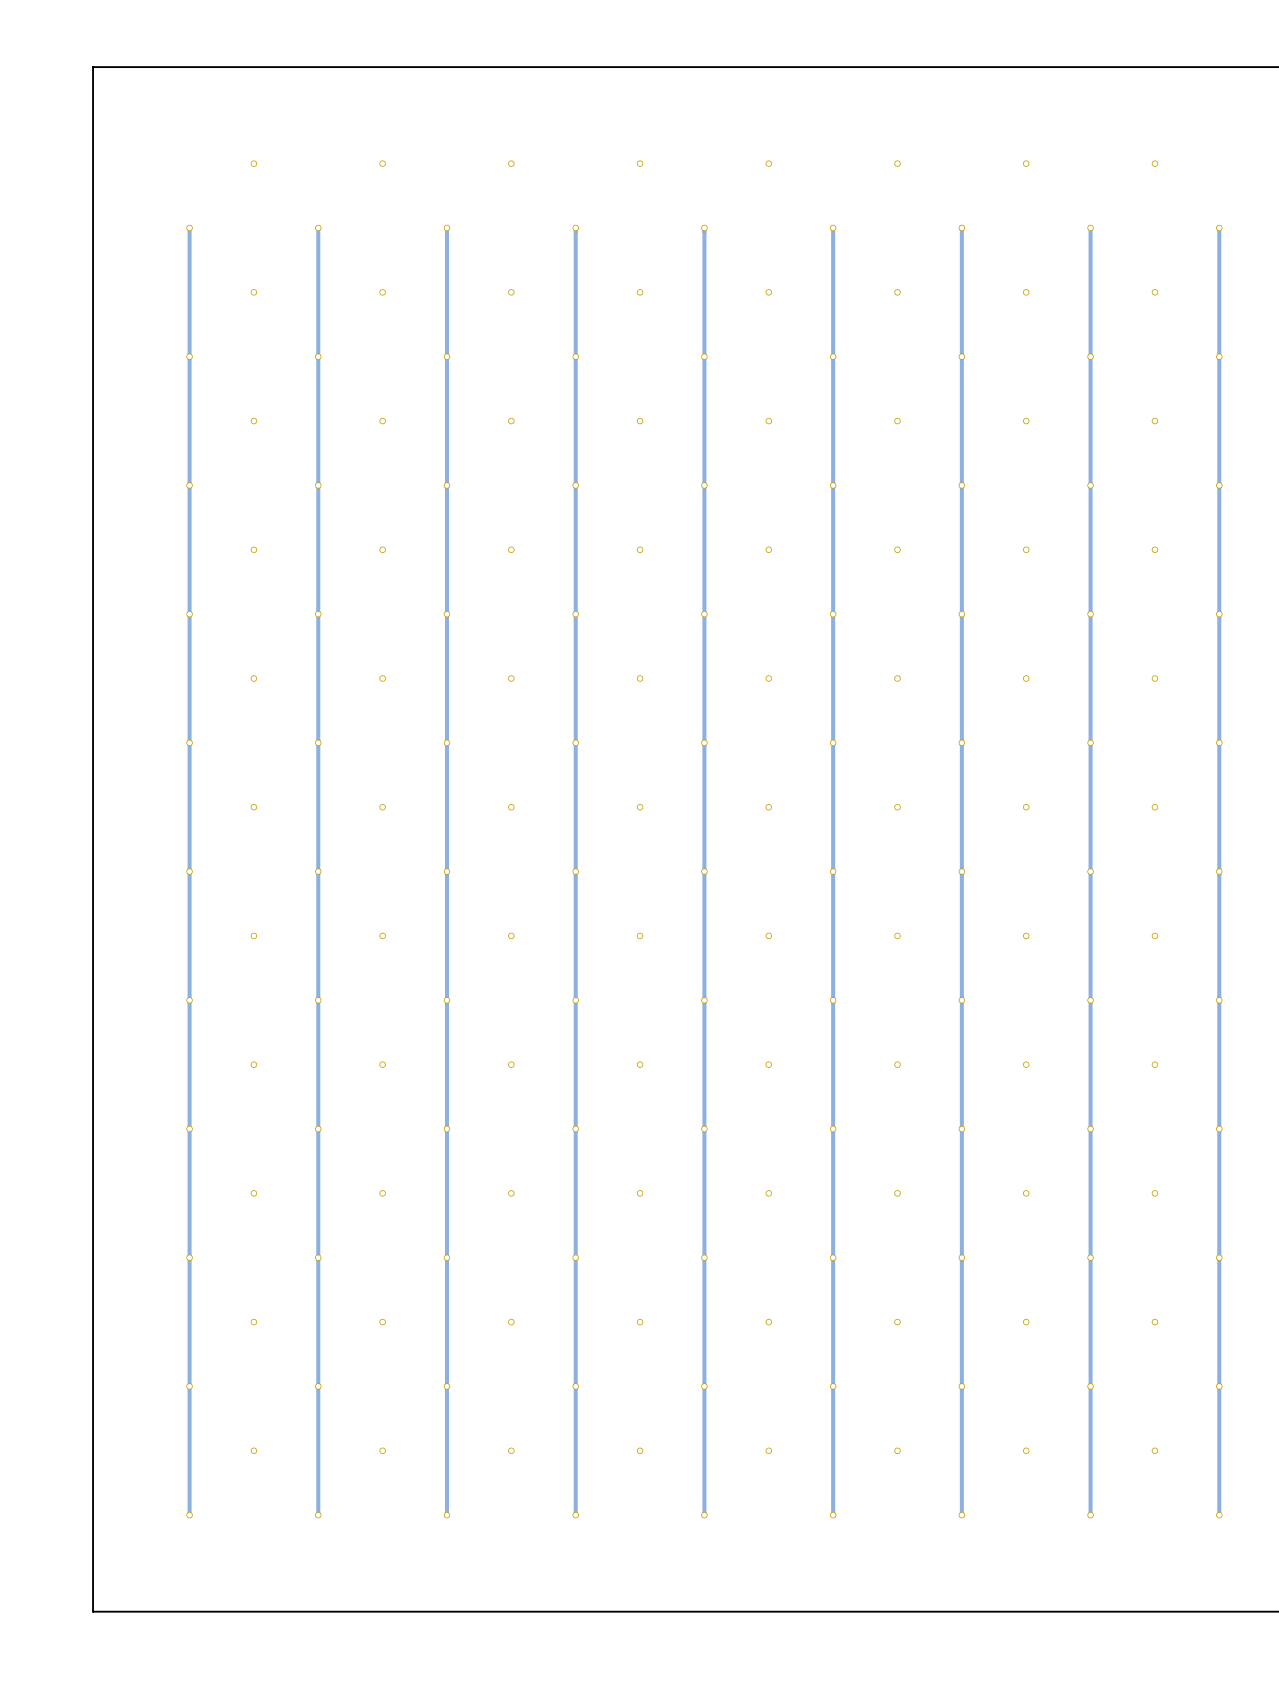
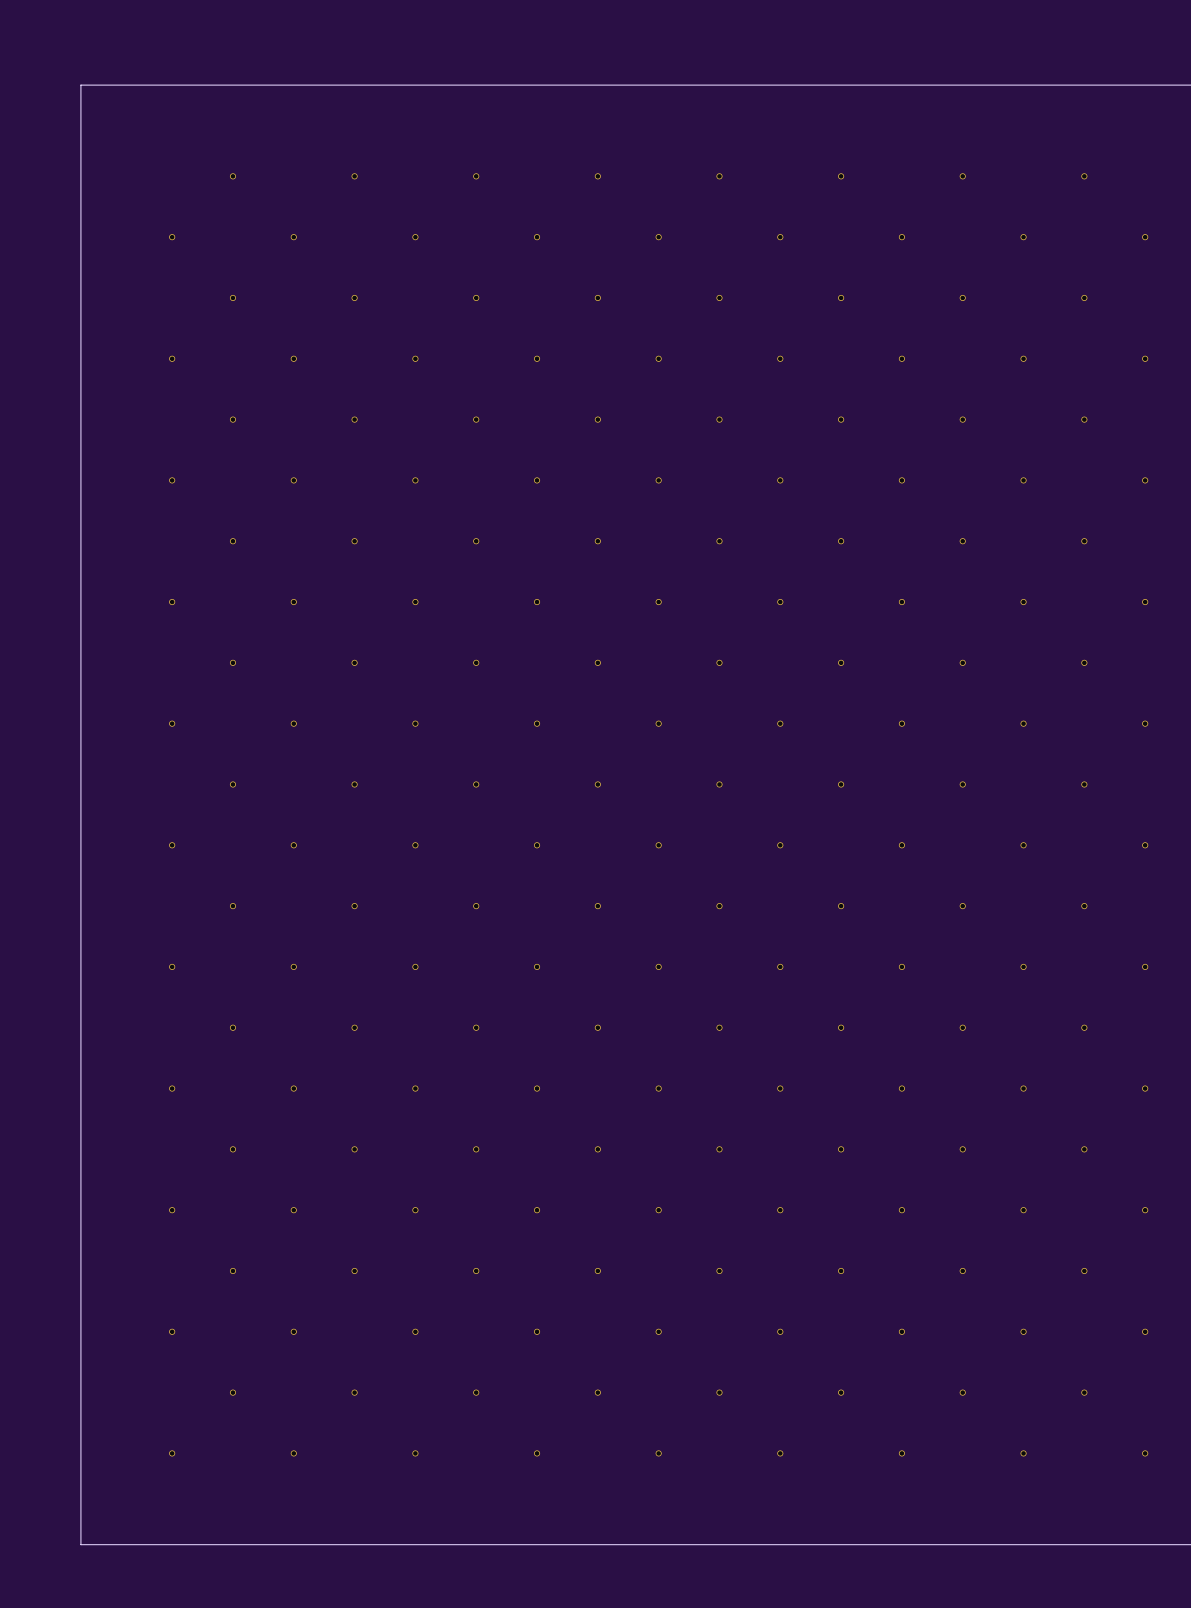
track: (189, 227) (189, 1515) -> none
track: (318, 227) (318, 1515) -> none
track: (447, 227) (447, 1515) -> none
track: (575, 227) (575, 1515) -> none
track: (704, 227) (704, 1515) -> none
track: (833, 227) (833, 1515) -> none
track: (961, 227) (961, 1515) -> none
track: (1090, 227) (1090, 1515) -> none
track: (1219, 227) (1219, 1515) -> none

